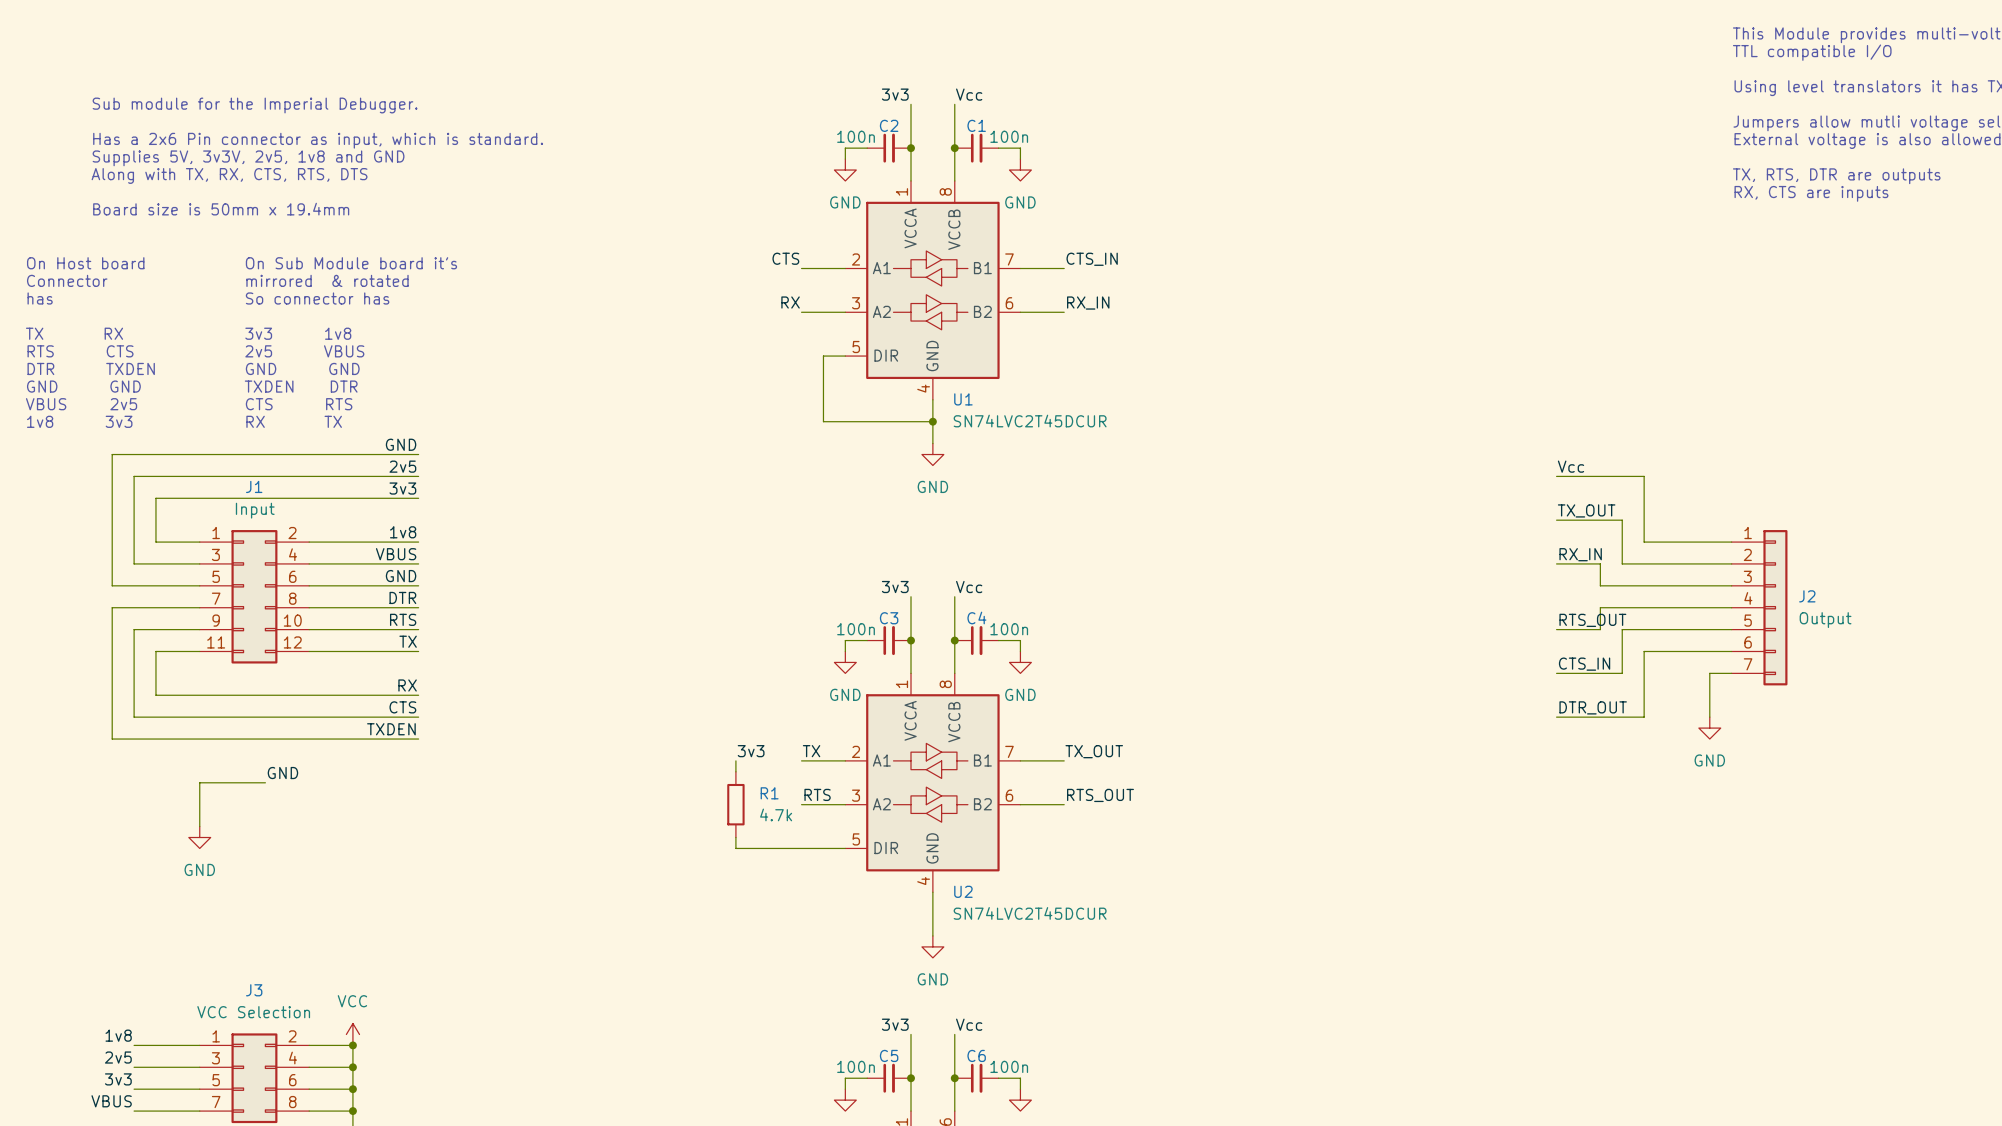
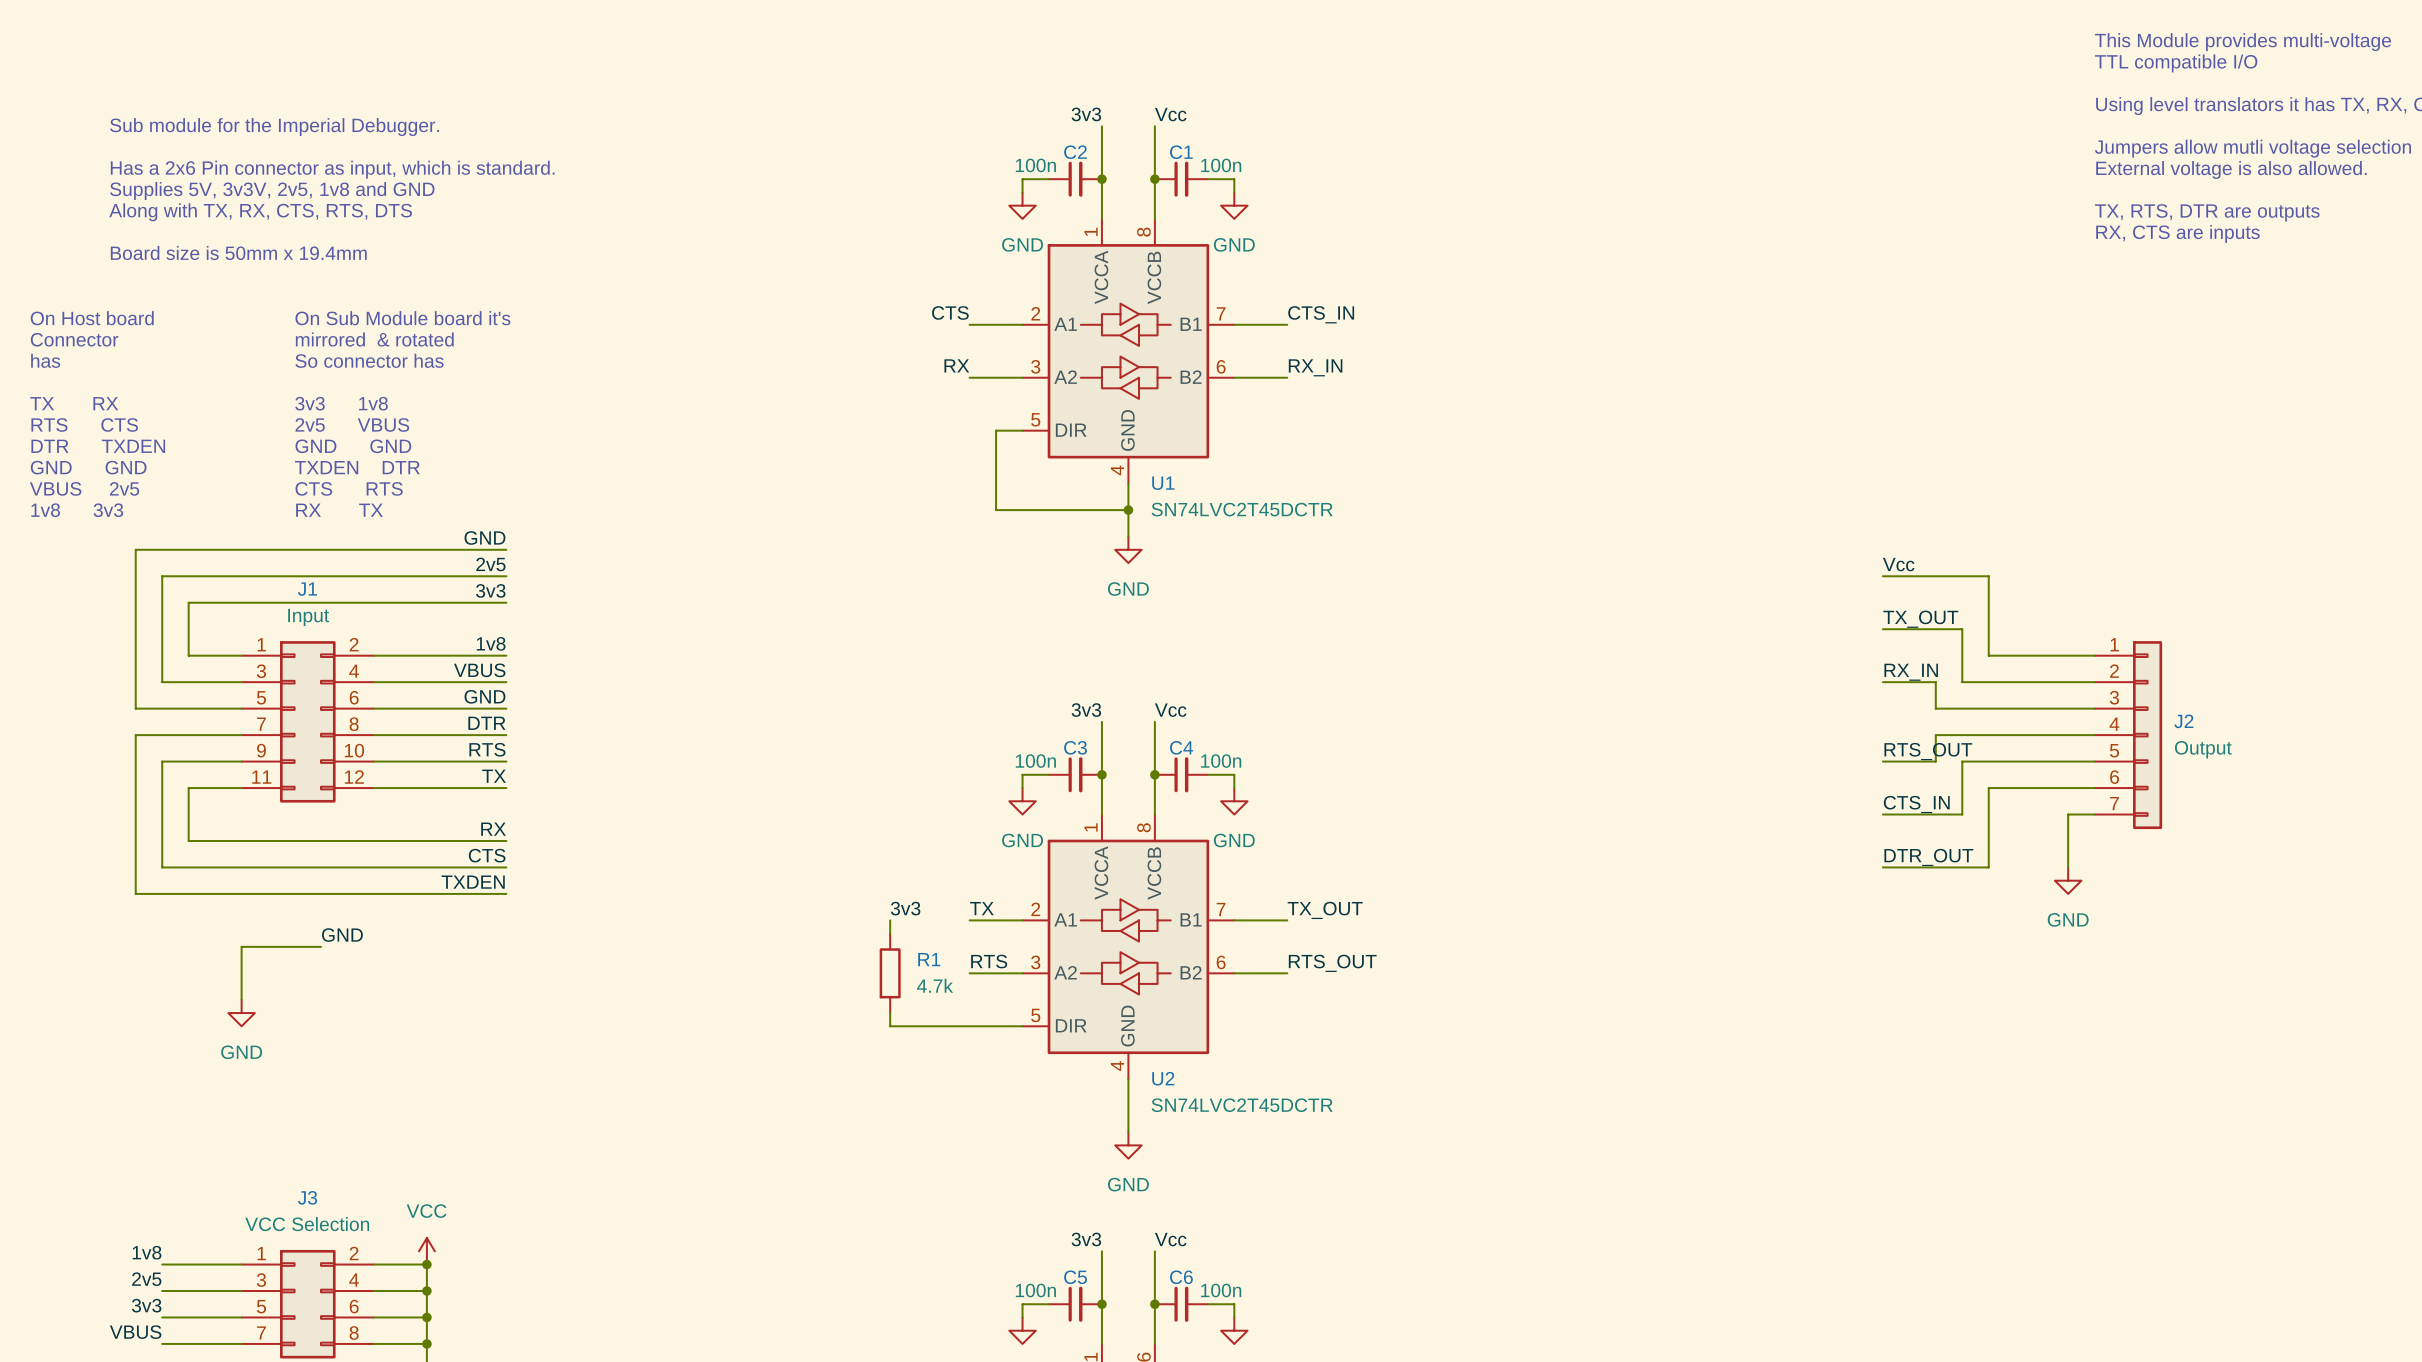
U1 value: SN74LVC2T45DCUR (1030, 421) -> SN74LVC2T45DCTR (1242, 509)
U2 value: SN74LVC2T45DCUR (1030, 913) -> SN74LVC2T45DCTR (1242, 1105)

